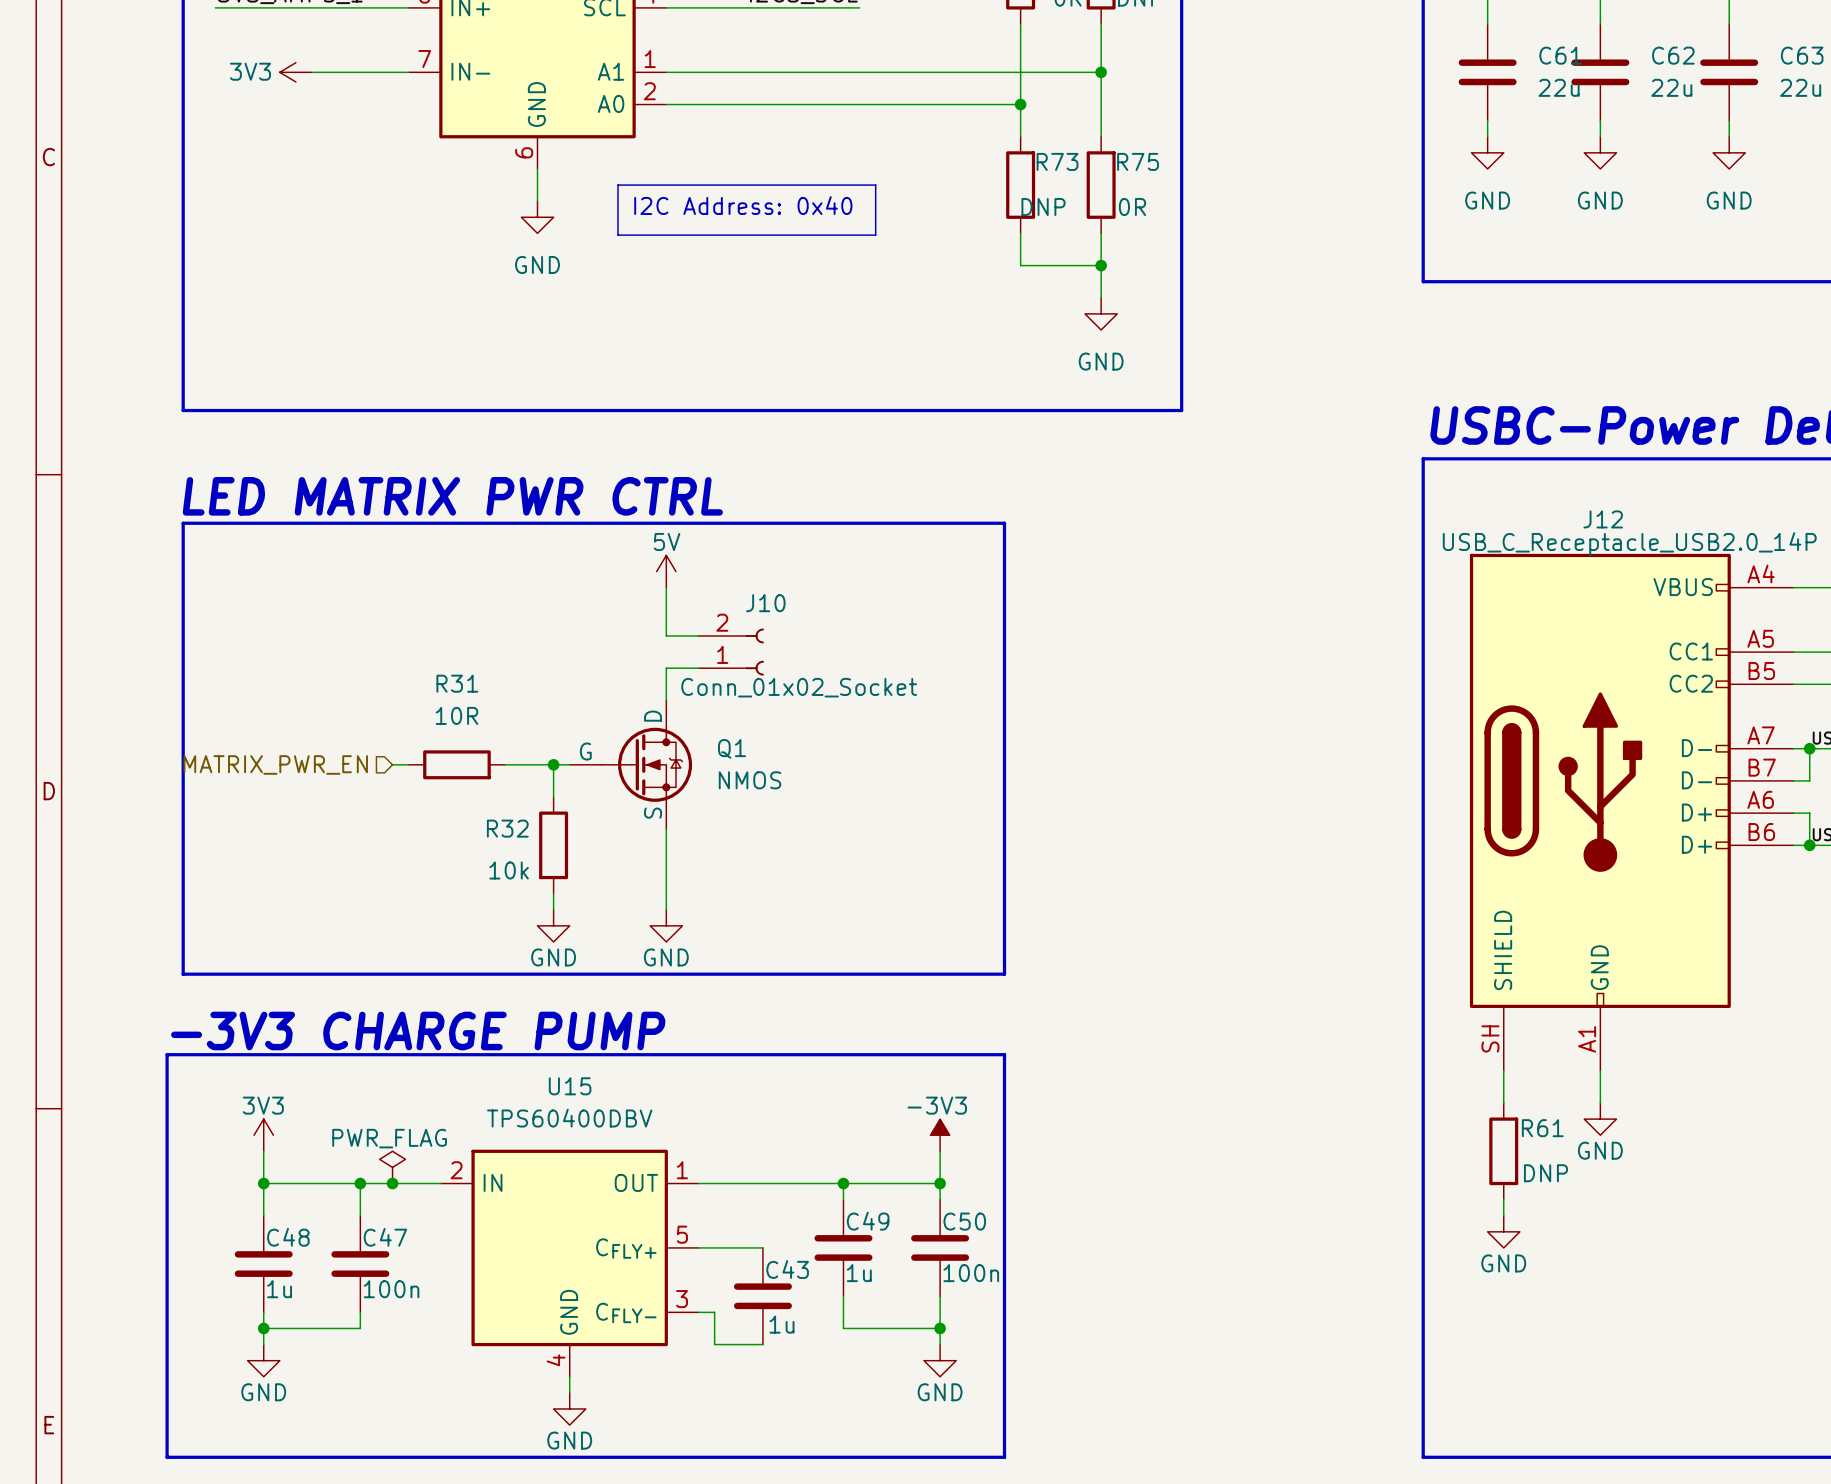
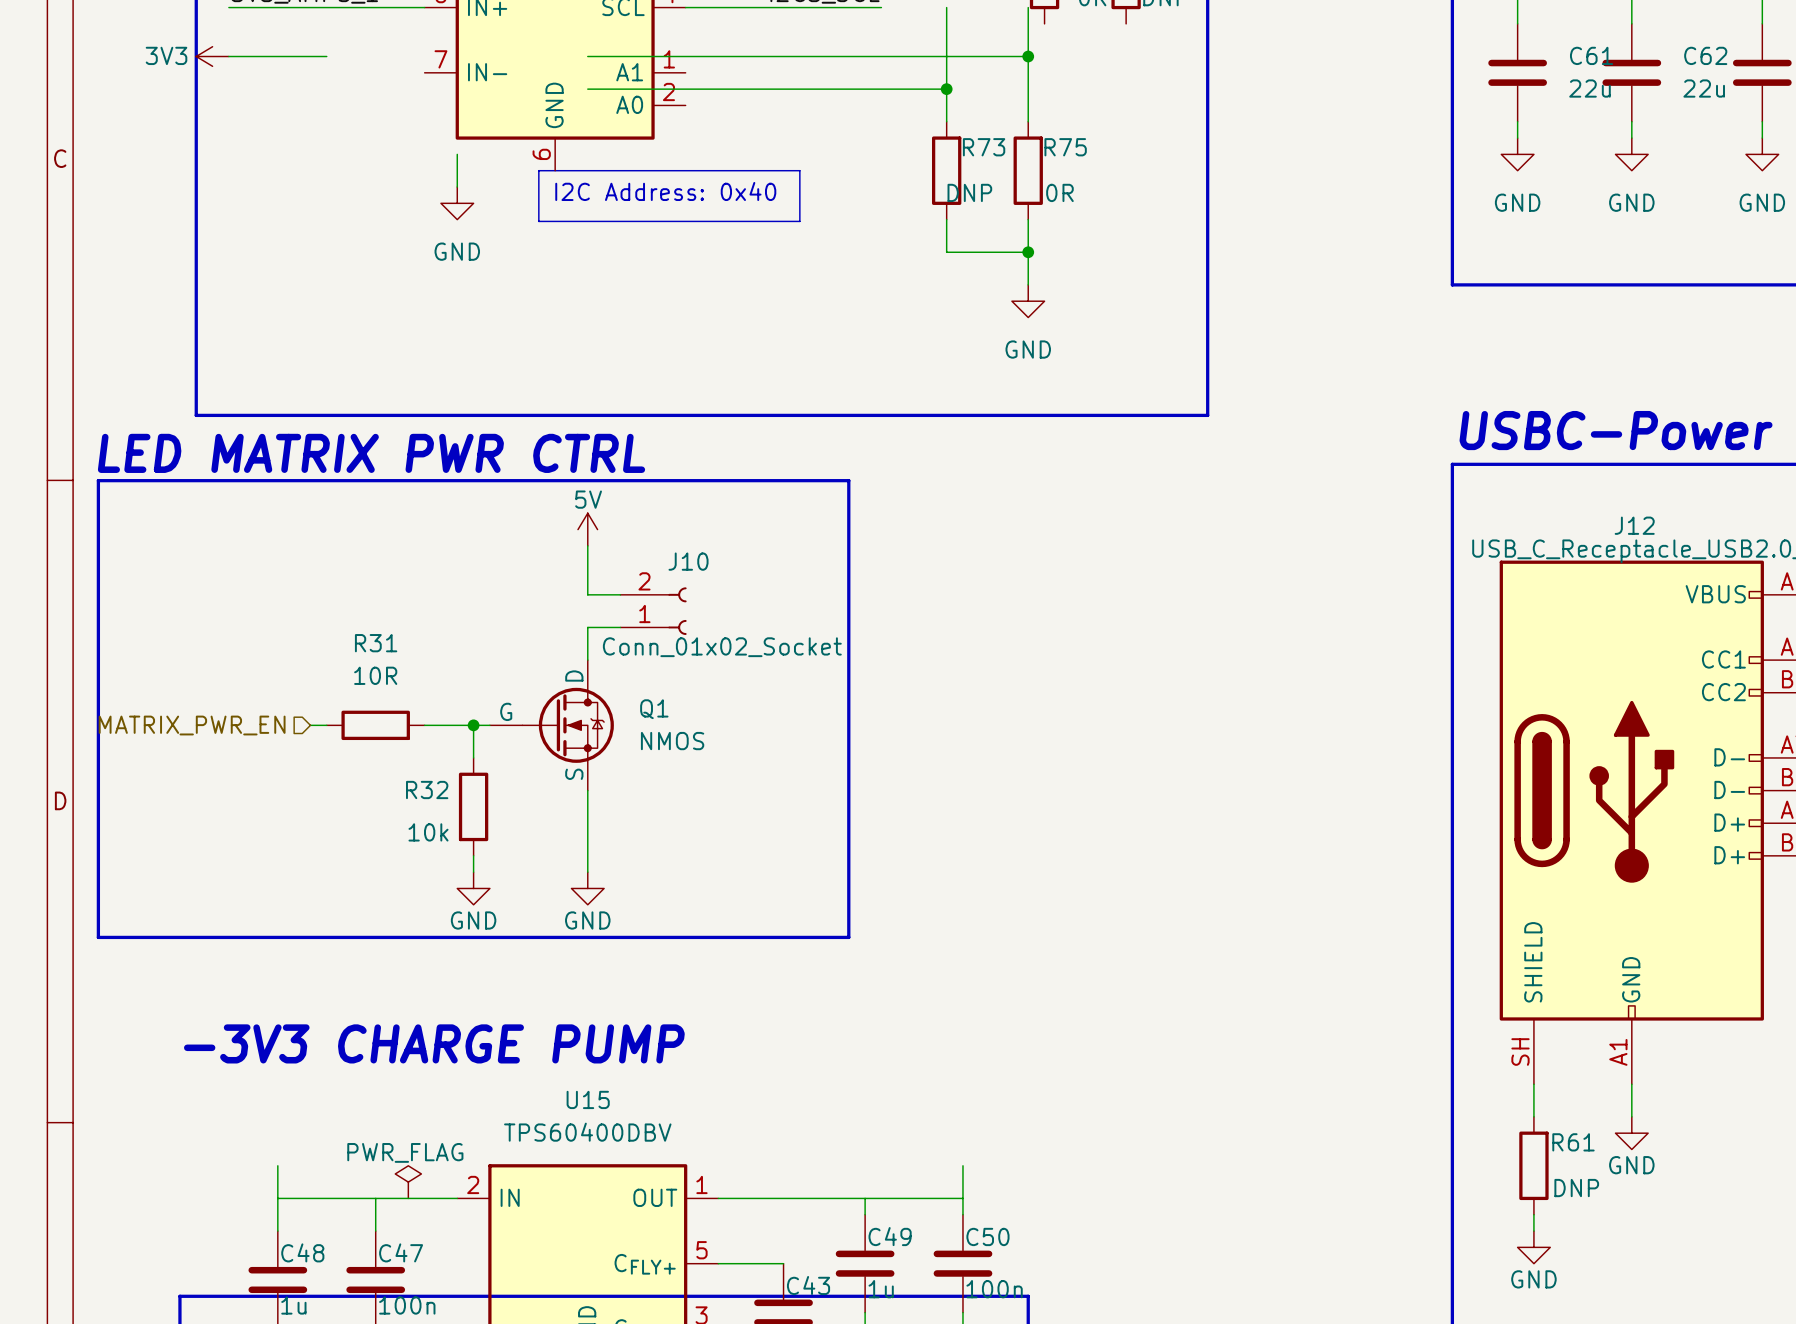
wire: (1020, 24) (1020, 136) -> (946, 7) (946, 121)
wire: (1101, 24) (1101, 136) -> (1028, 7) (1028, 121)
junction: none -> (1028, 56)
power symbol position: 3V3 (295, 72) -> 3V3 (212, 56)
wire: (312, 72) (408, 72) -> (228, 56) (326, 56)
wire: (666, 72) (1101, 72) -> (587, 56) (1028, 56)
junction: (1101, 72) -> none
junction: none -> (946, 89)
wire: (666, 104) (1020, 104) -> (587, 89) (946, 89)
junction: (1020, 104) -> none
wire: (537, 168) (537, 201) -> (457, 154) (457, 187)
line: (618, 185) (875, 185) (875, 235) (618, 235) (618, 185) -> (538, 170) (799, 170) (799, 221) (538, 221) (538, 170)
R73 position: (1020, 185) -> (946, 170)
R75 position: (1101, 185) -> (1028, 170)
text position: I2C Address: 0x40 (743, 205) -> I2C Address: 0x40 (665, 191)
power symbol position: GND (537, 217) -> GND (457, 203)
wire: (1020, 233) (1020, 265) (1101, 265) -> (946, 219) (946, 252) (1028, 252)
wire: (1101, 233) (1101, 297) -> (1028, 219) (1028, 284)
junction: none -> (1028, 252)
junction: (1101, 265) -> none
power symbol position: GND (1101, 313) -> GND (1028, 301)
text position: LED MATRIX PWR CTRL (452, 496) -> LED MATRIX PWR CTRL (371, 453)
line: (183, 523) (183, 974) (1004, 974) (1004, 523) (183, 523) -> (98, 480) (98, 937) (848, 937) (848, 480) (98, 480)
power symbol position: 5V (666, 571) -> 5V (587, 529)
wire: (666, 587) (666, 635) (698, 635) -> (587, 545) (587, 594) (620, 594)
J10 position: (731, 652) -> (653, 611)
wire: (698, 668) (666, 668) (666, 700) -> (620, 627) (587, 627) (587, 660)
junction: none -> (473, 725)
hierarchical label position: MATRIX_PWR_EN (275, 764) -> MATRIX_PWR_EN (192, 725)
wire: (392, 764) (408, 764) -> (310, 725) (326, 725)
R31 position: (456, 764) -> (375, 725)
wire: (505, 764) (569, 764) -> (424, 725) (489, 725)
wire: (553, 764) (553, 797) -> (473, 725) (473, 757)
junction: (553, 764) -> none
Q1 position: (630, 764) -> (551, 725)
wire: (666, 829) (666, 909) -> (587, 790) (587, 872)
R32 position: (553, 845) -> (473, 806)
power symbol: none -> GND (473, 888)
wire: (553, 893) (553, 909) -> (473, 855) (473, 872)
power symbol position: GND (553, 925) -> GND (587, 888)
power symbol: GND (666, 925) -> none
power symbol: 3V3 (263, 1135) -> none
power symbol: -3V3 (940, 1135) -> none
junction: (263, 1183) -> none
junction: (360, 1183) -> none
junction: (392, 1183) -> none
junction: (843, 1183) -> none
junction: (940, 1183) -> none
line: (167, 1280) (167, 1054) (1004, 1054) (1004, 1280) -> (179, 1296) (1028, 1296)

